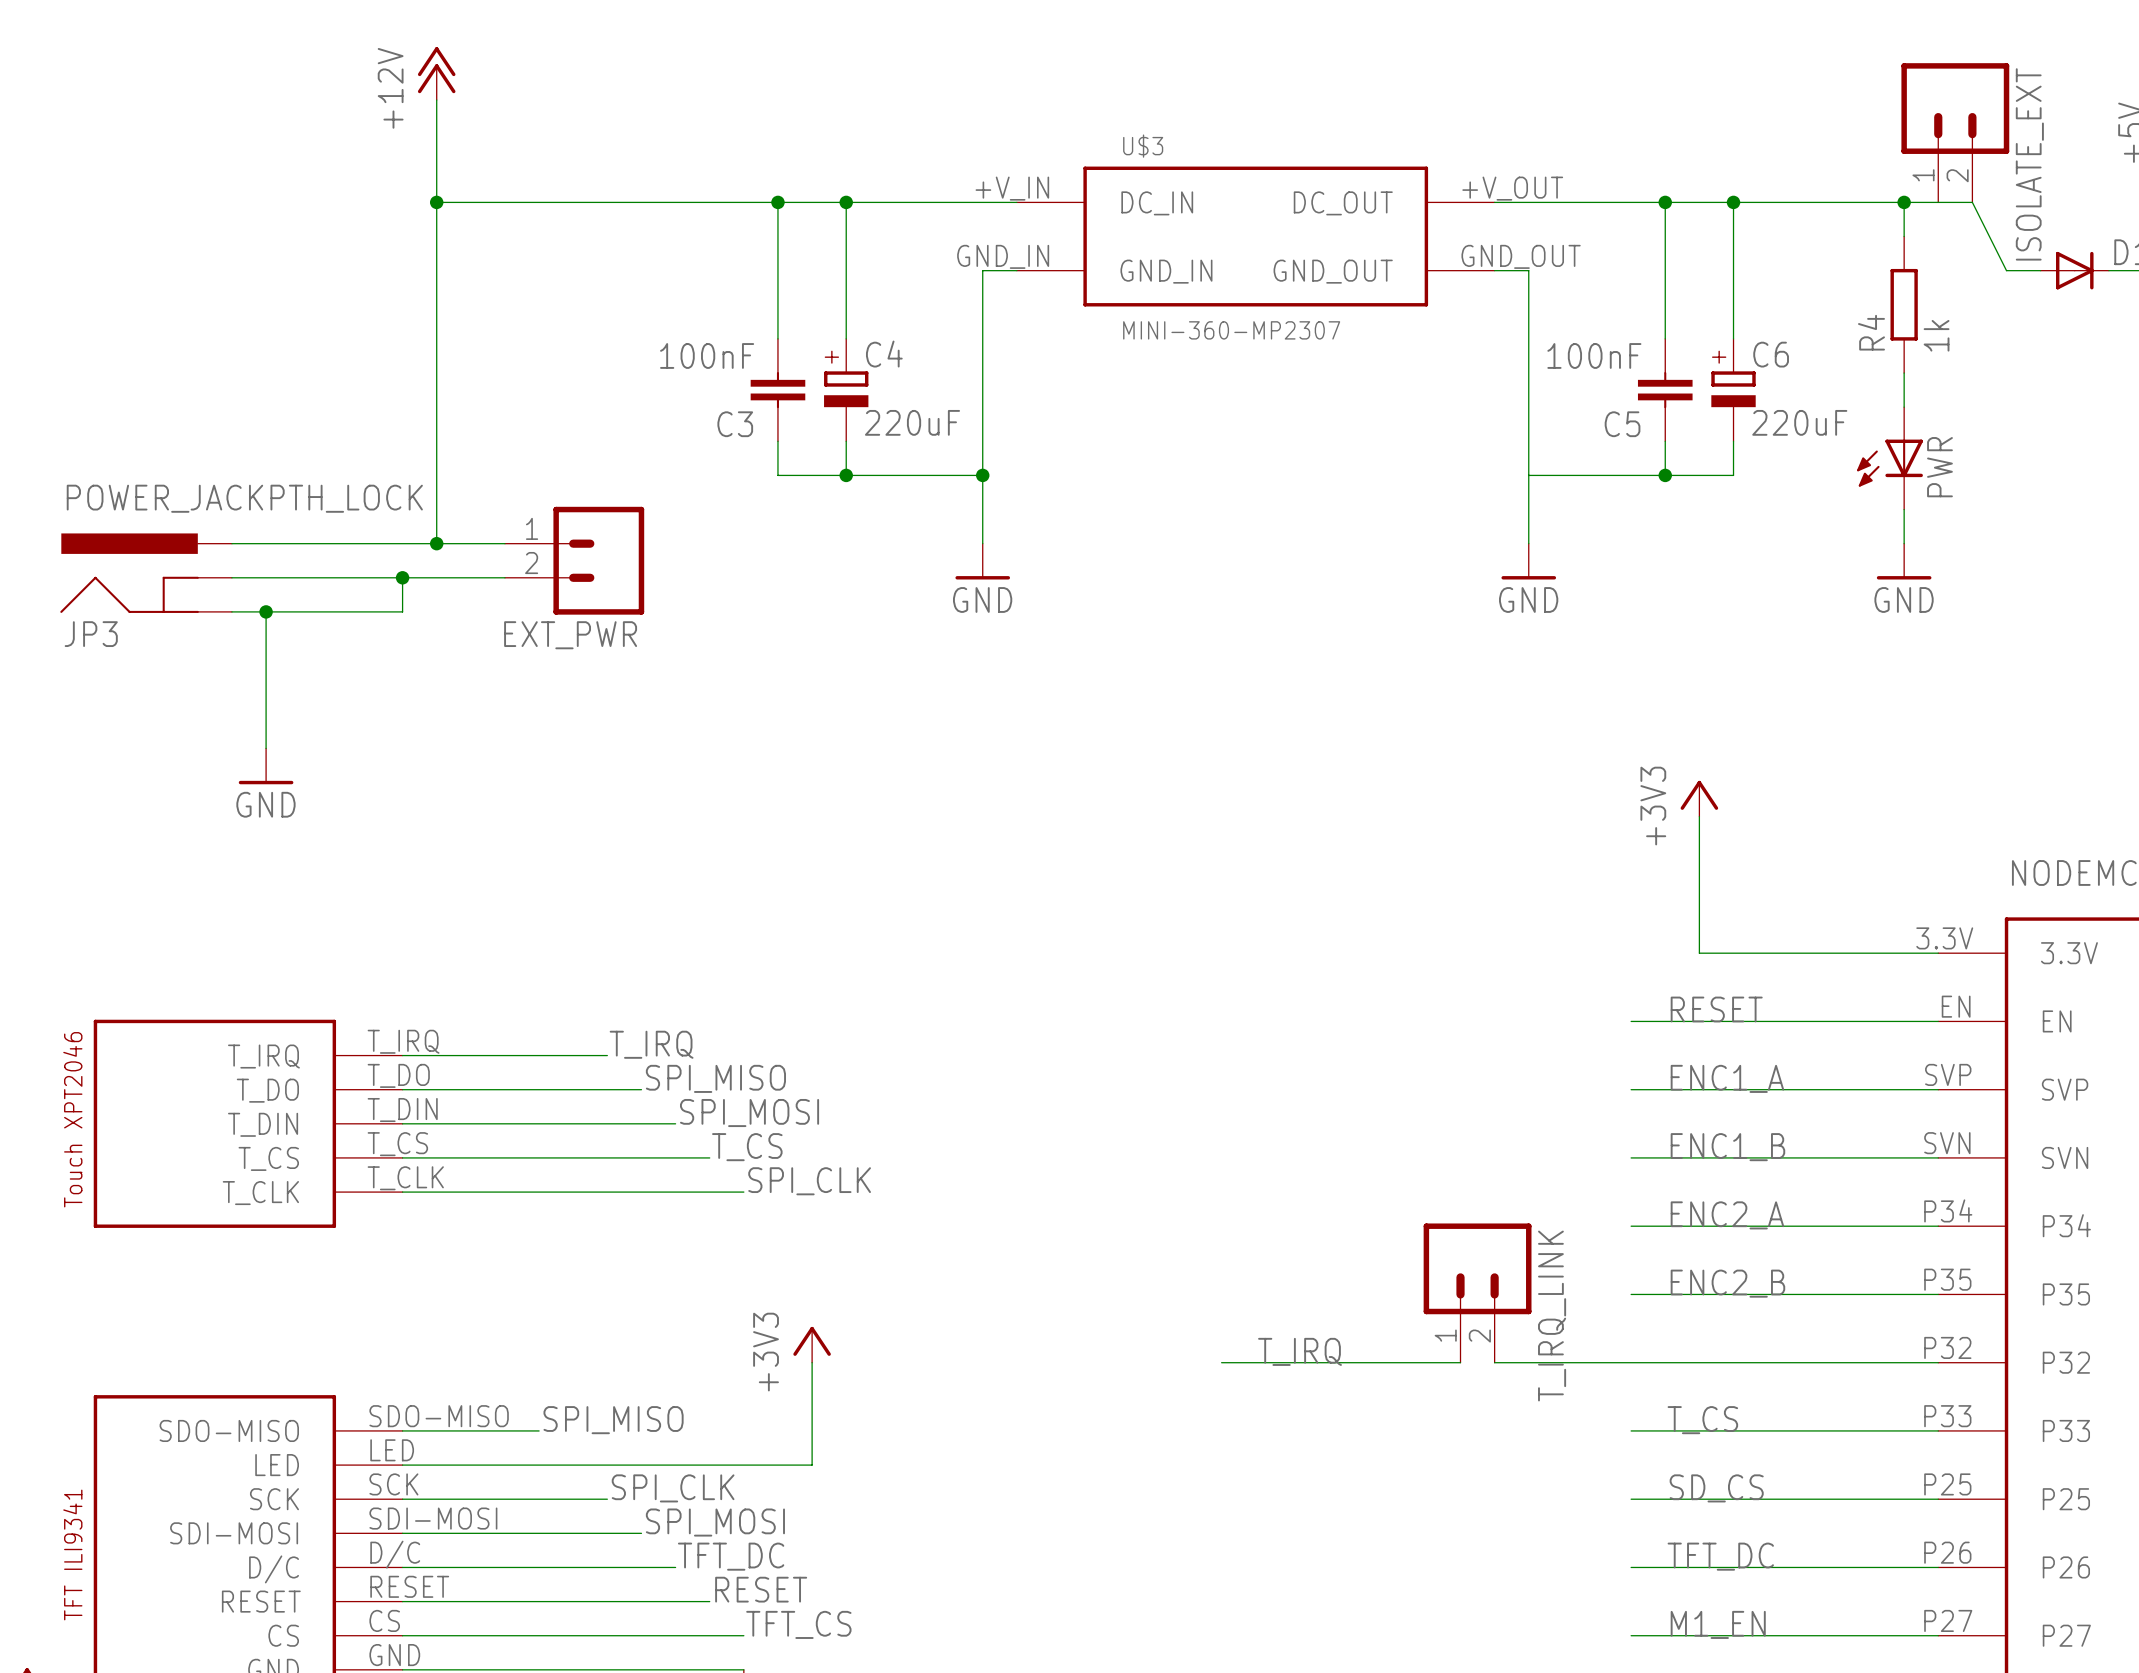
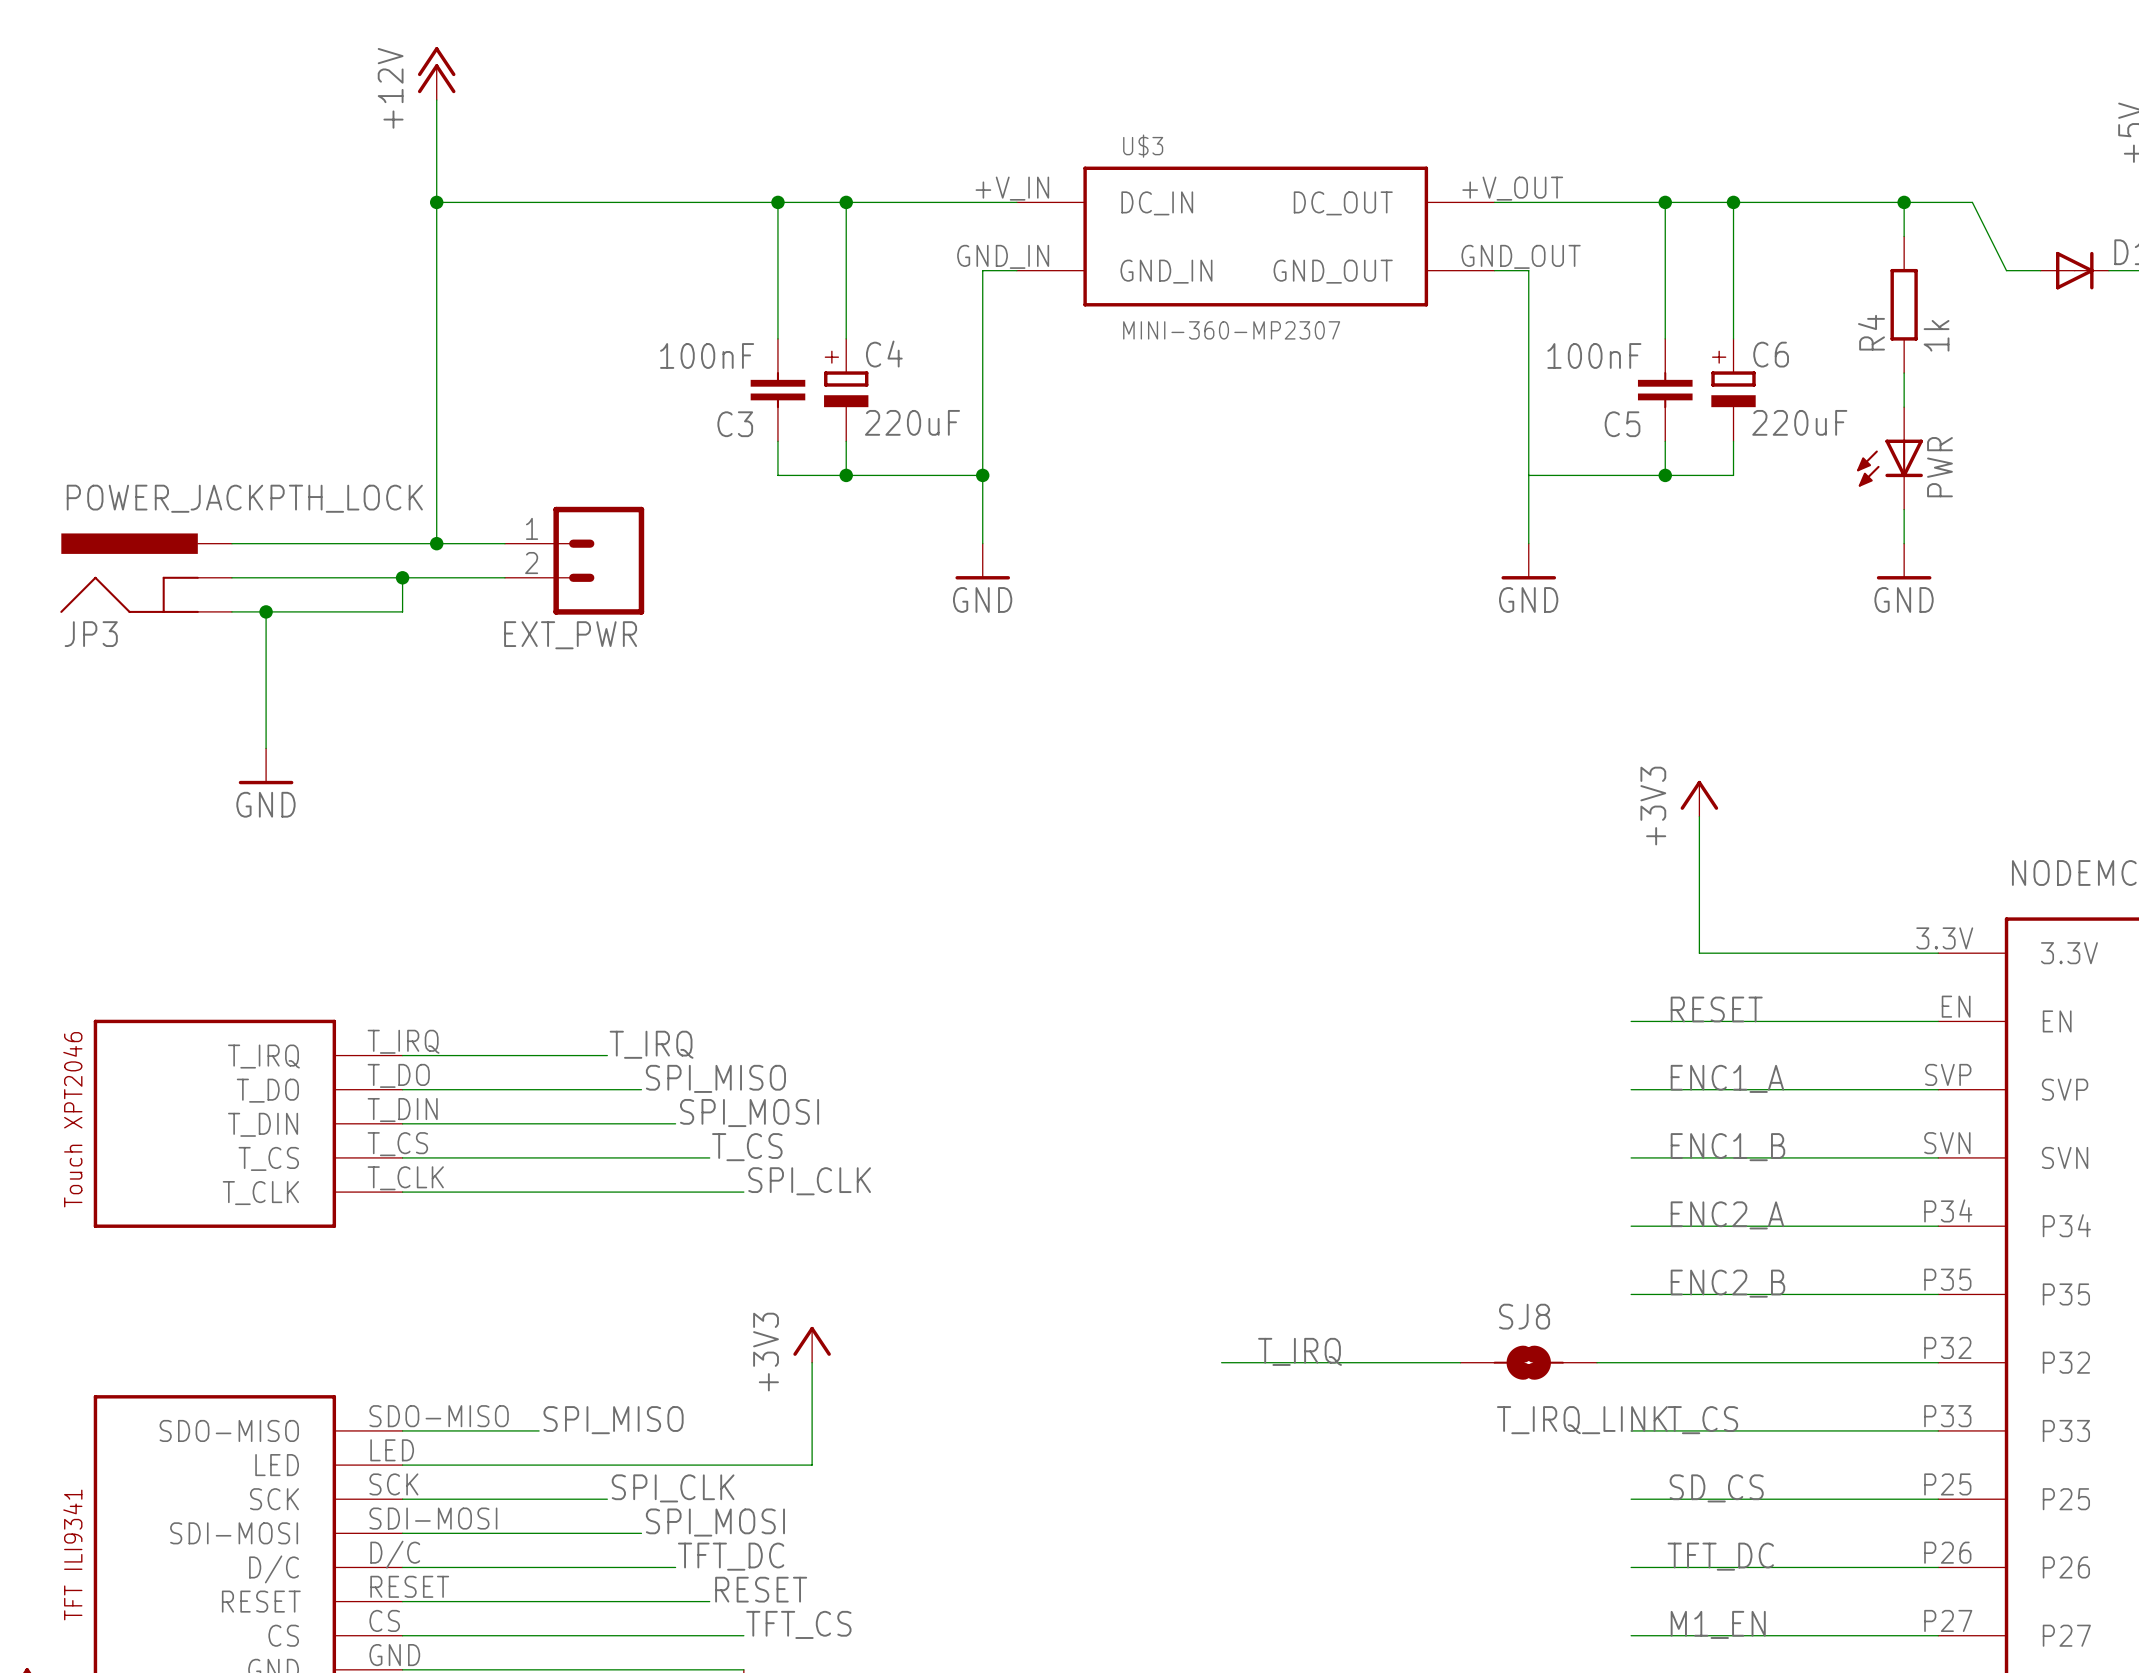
ISOLATE_EXT: (1955, 132) -> none
T_IRQ_LINK: (1477, 1293) -> none
SJ8: none -> T_IRQ_LINK (1528, 1362)

